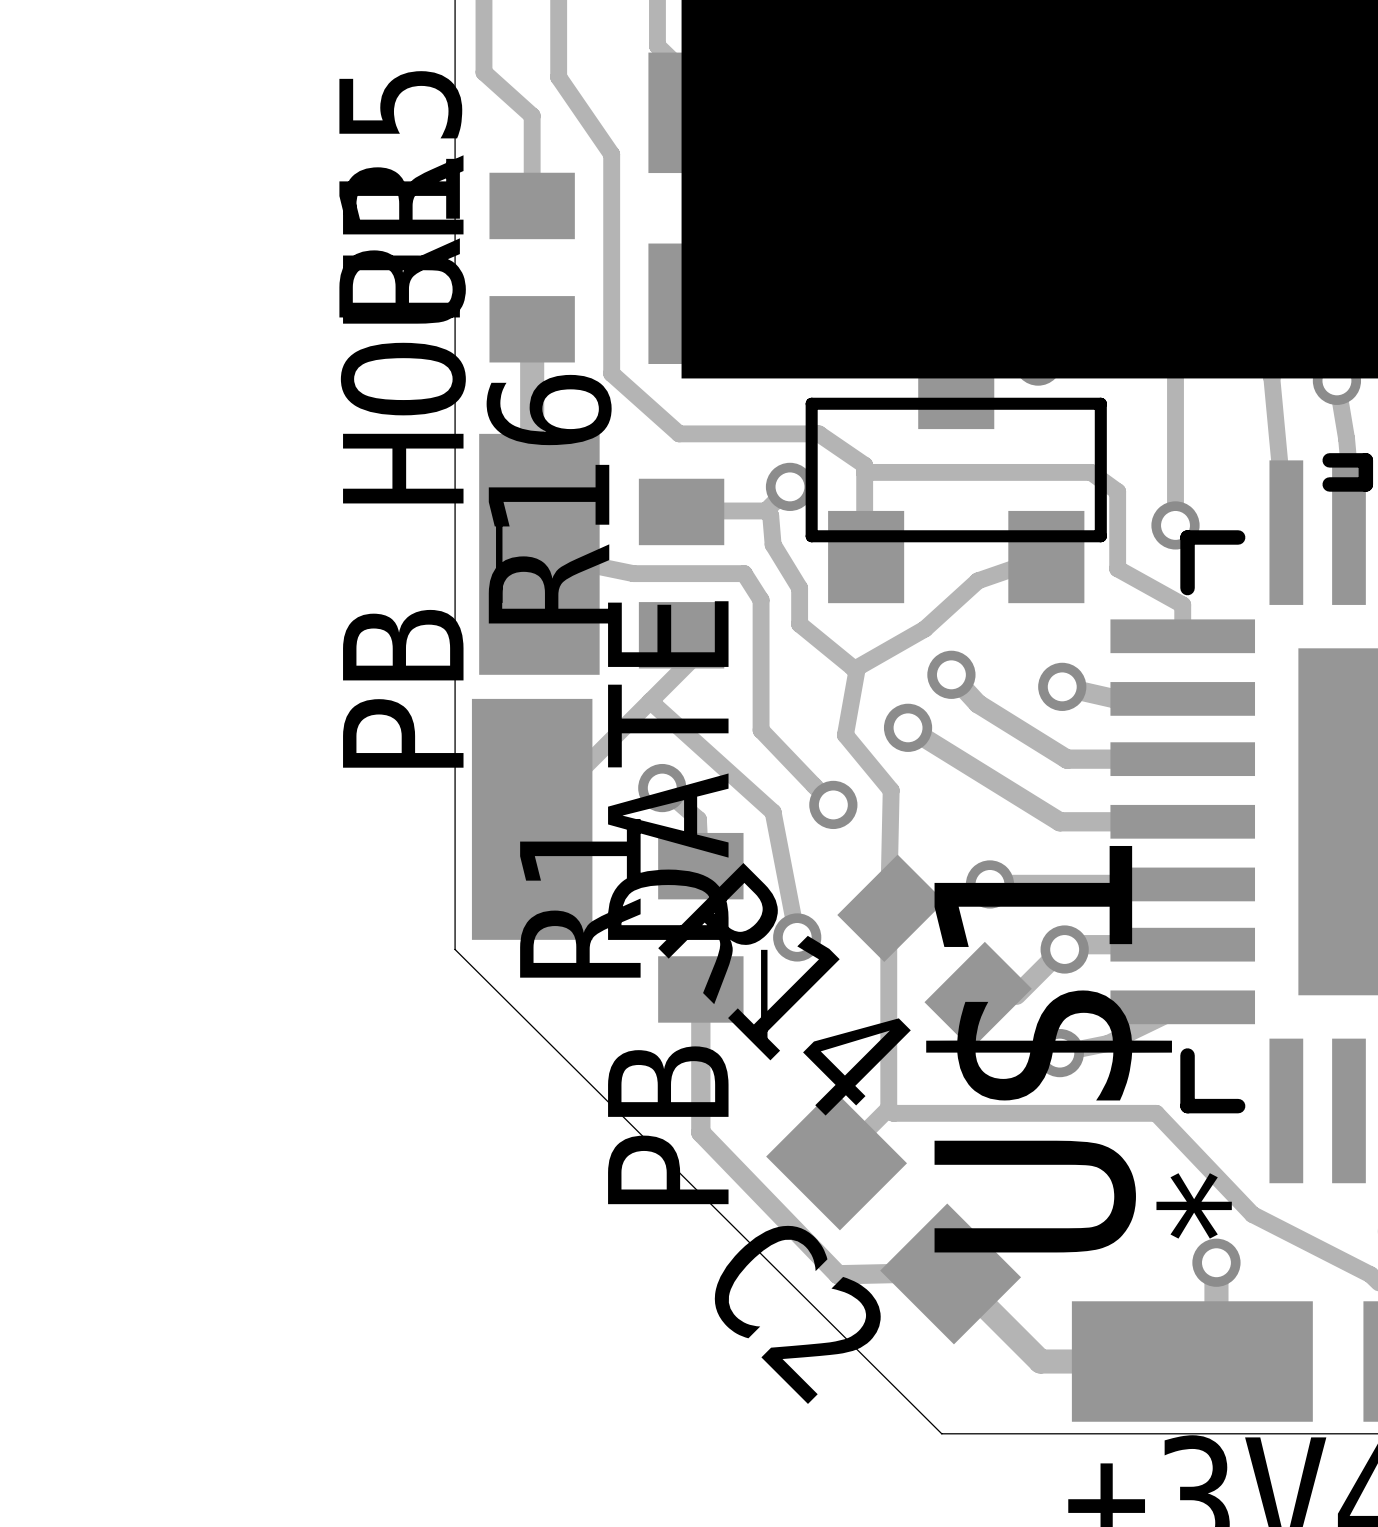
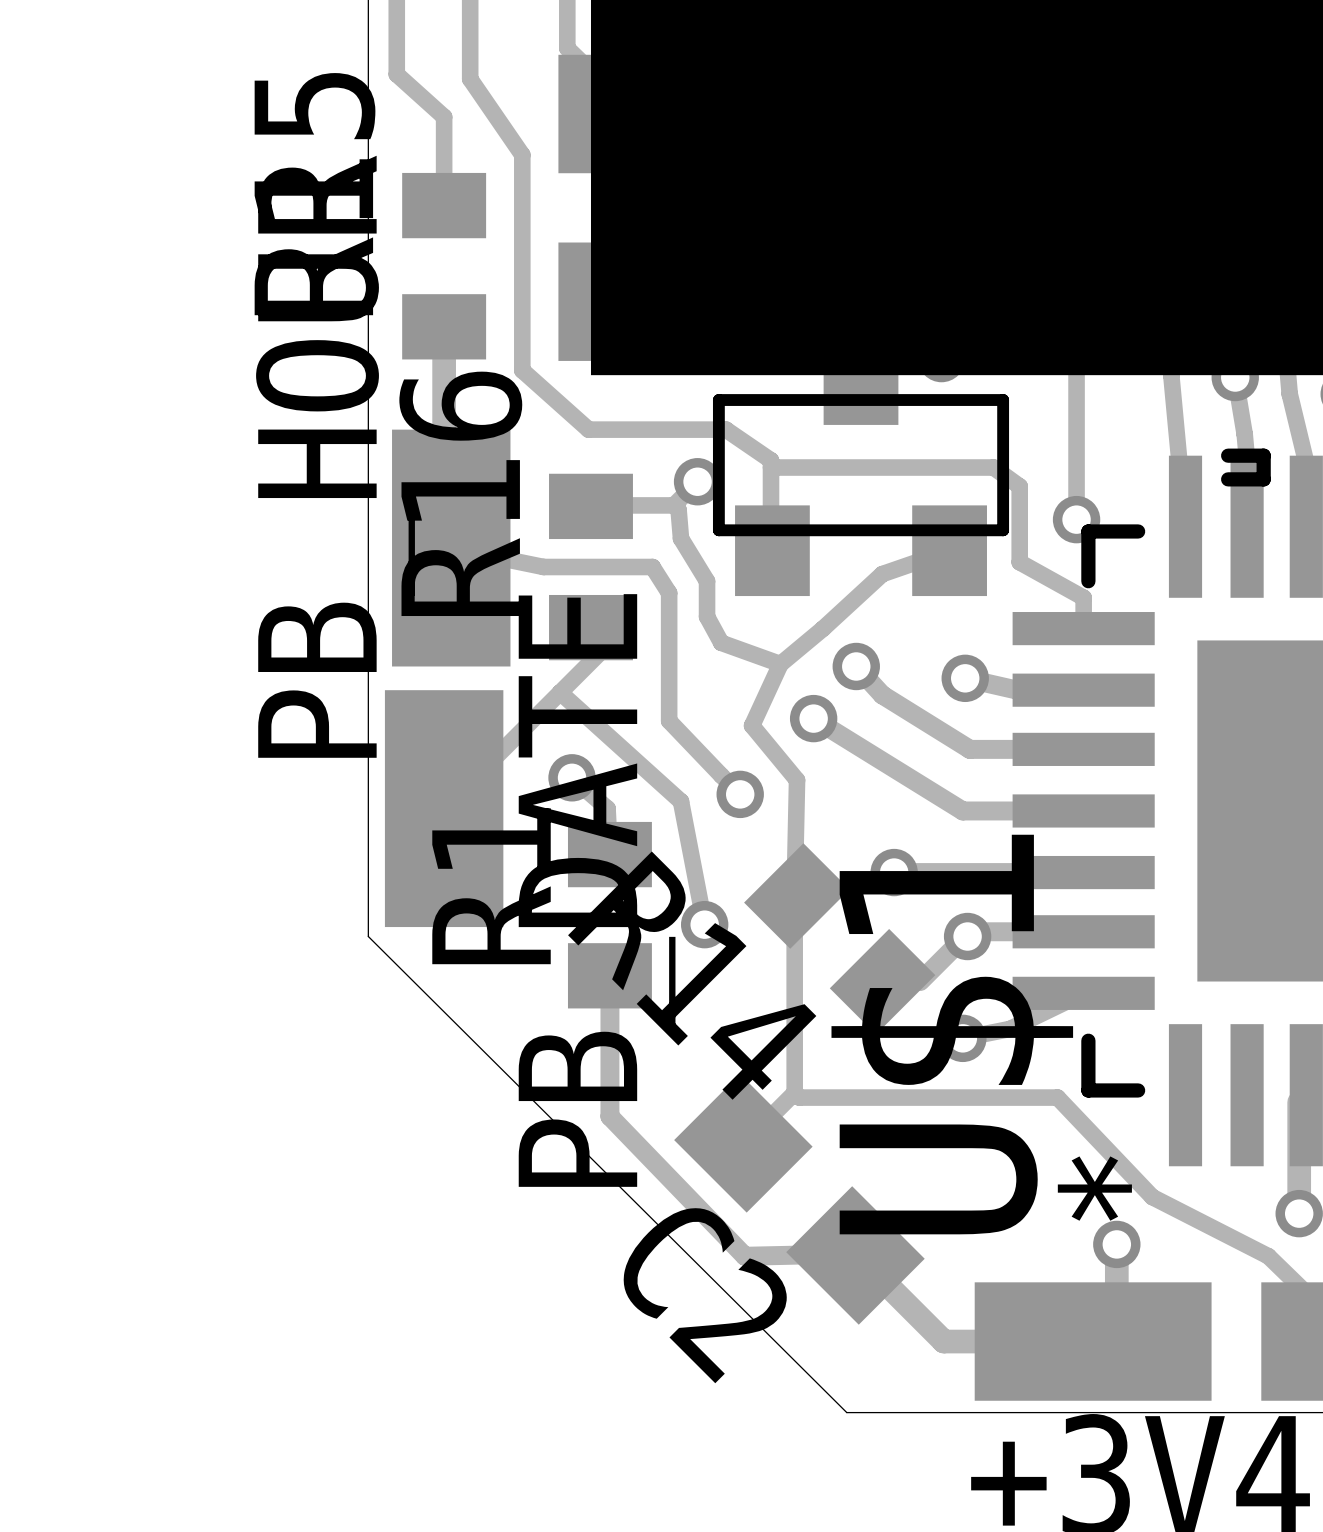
track: (977, 580) (924, 629) (857, 667) -> (882, 574) (823, 628) (780, 664)
track: (799, 624) (852, 667) (857, 667) -> (707, 616) (721, 642) (780, 664)
track: (857, 667) (845, 735) -> (780, 664) (752, 725)

